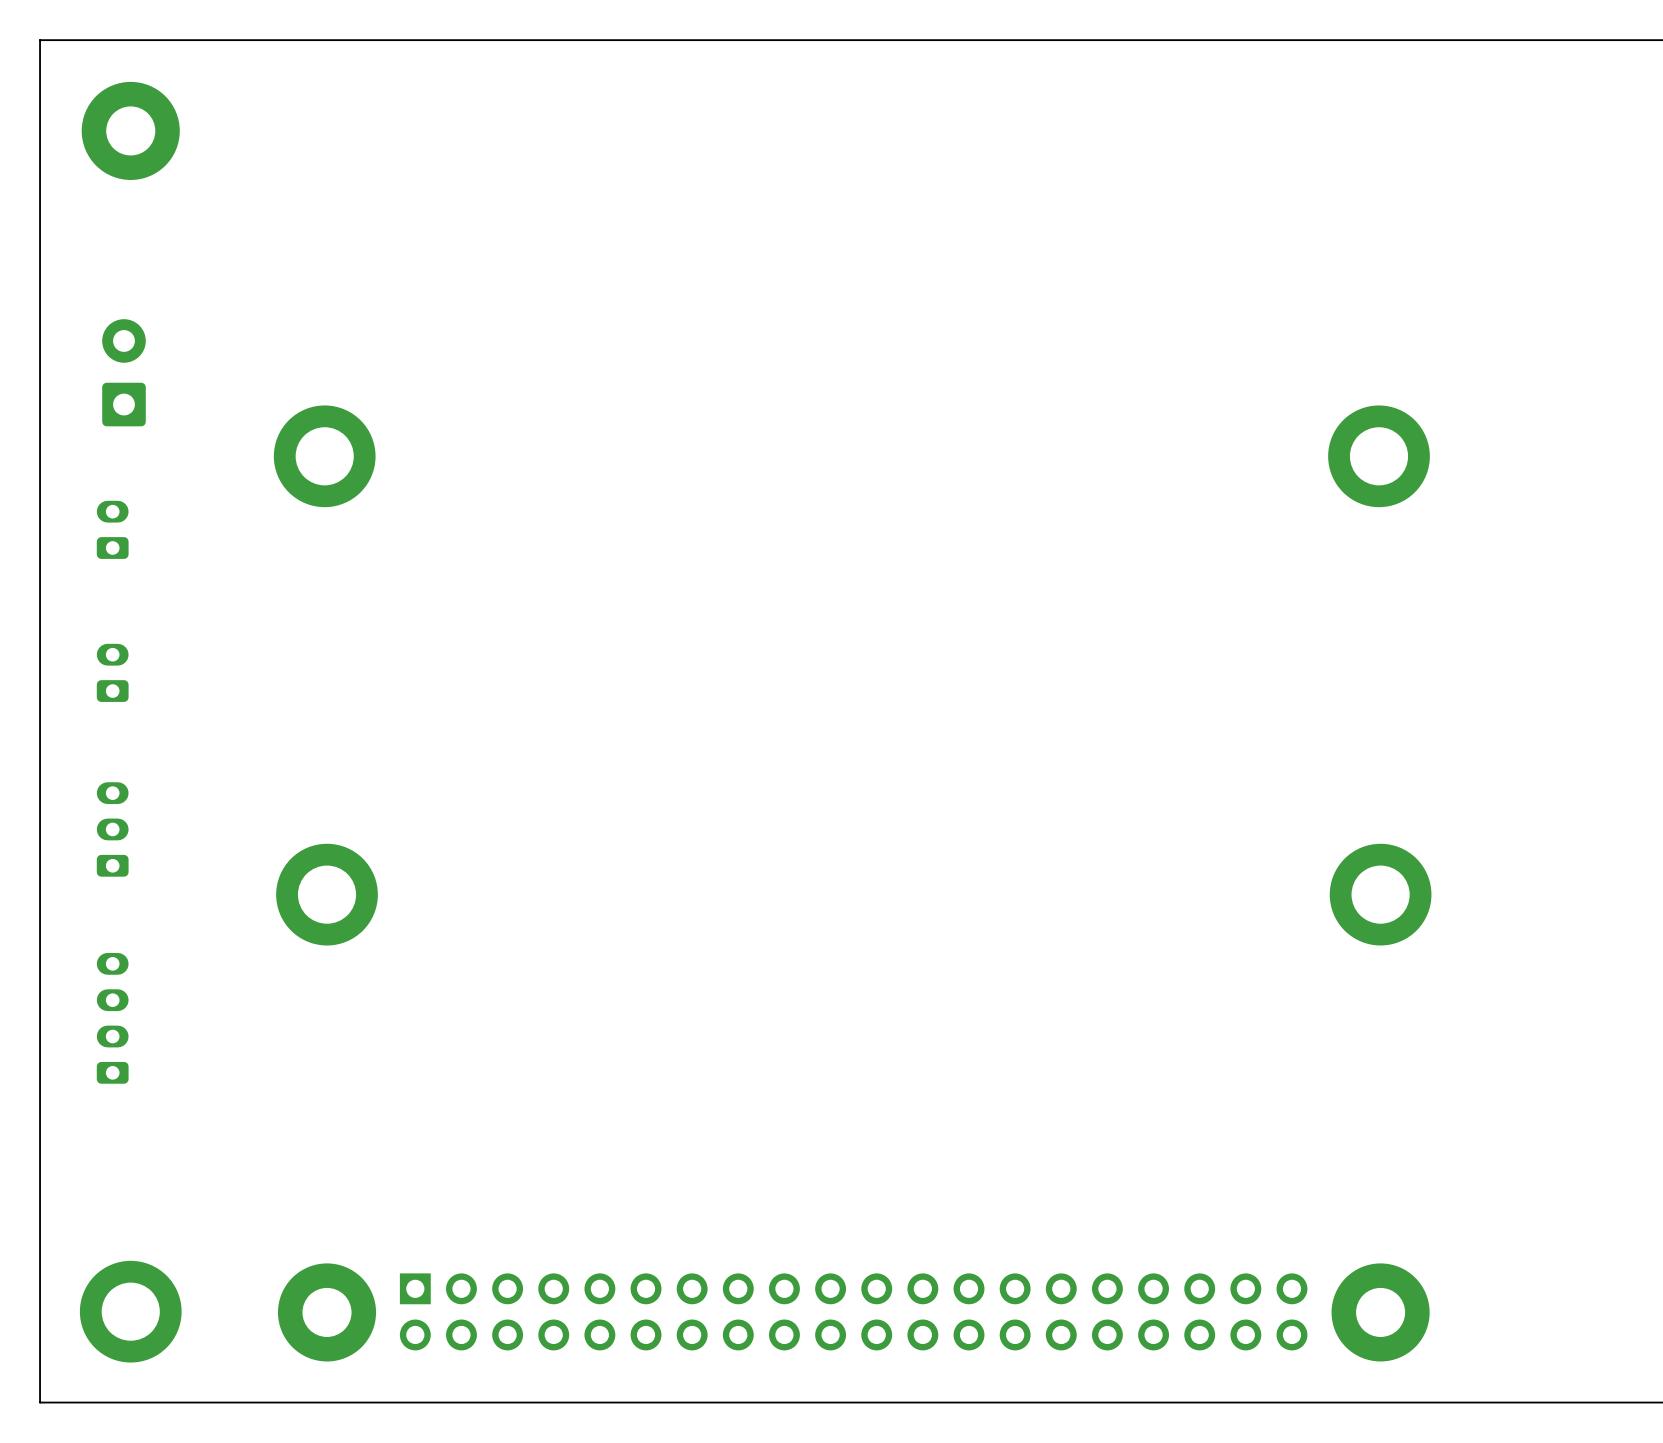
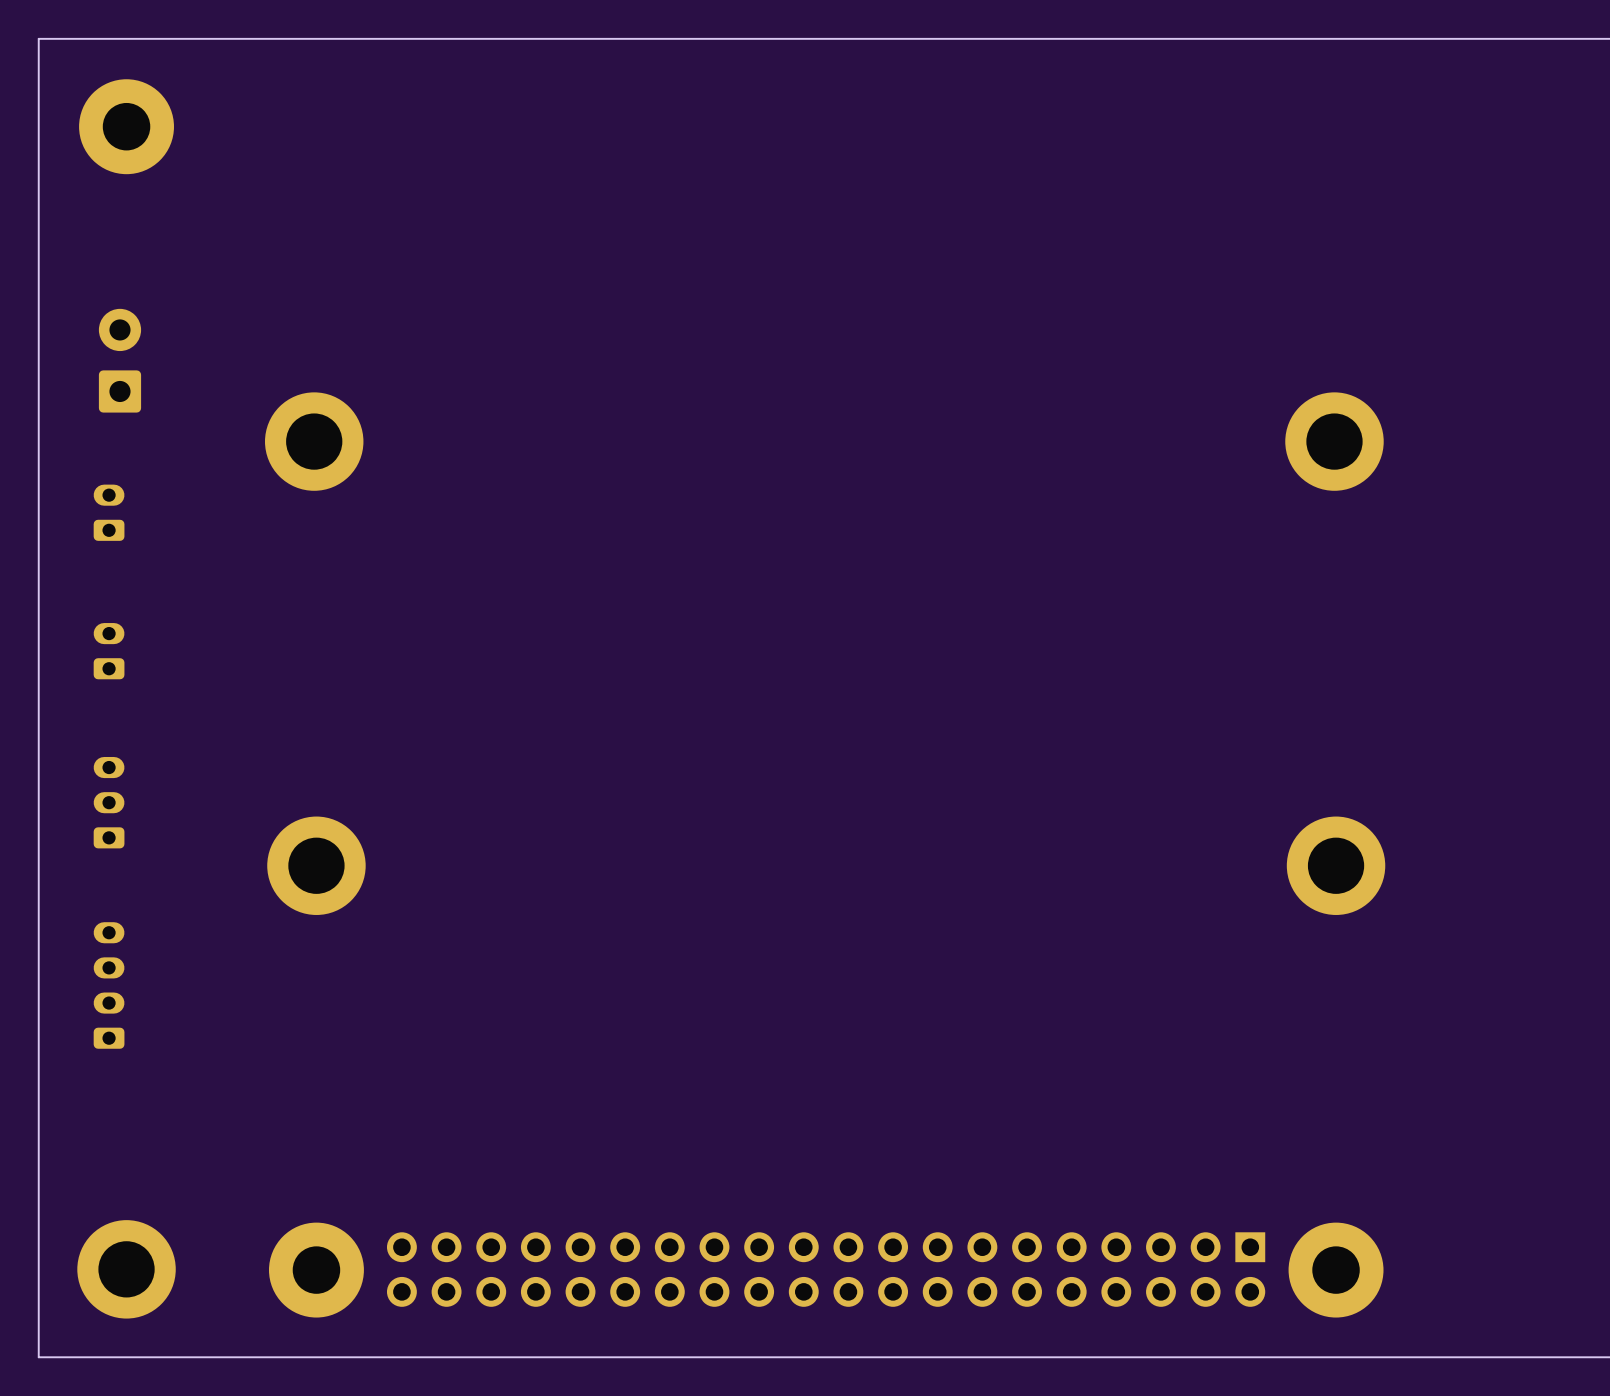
part footprint: [399, 1273, 1308, 1351] -> [386, 1232, 1266, 1307]

